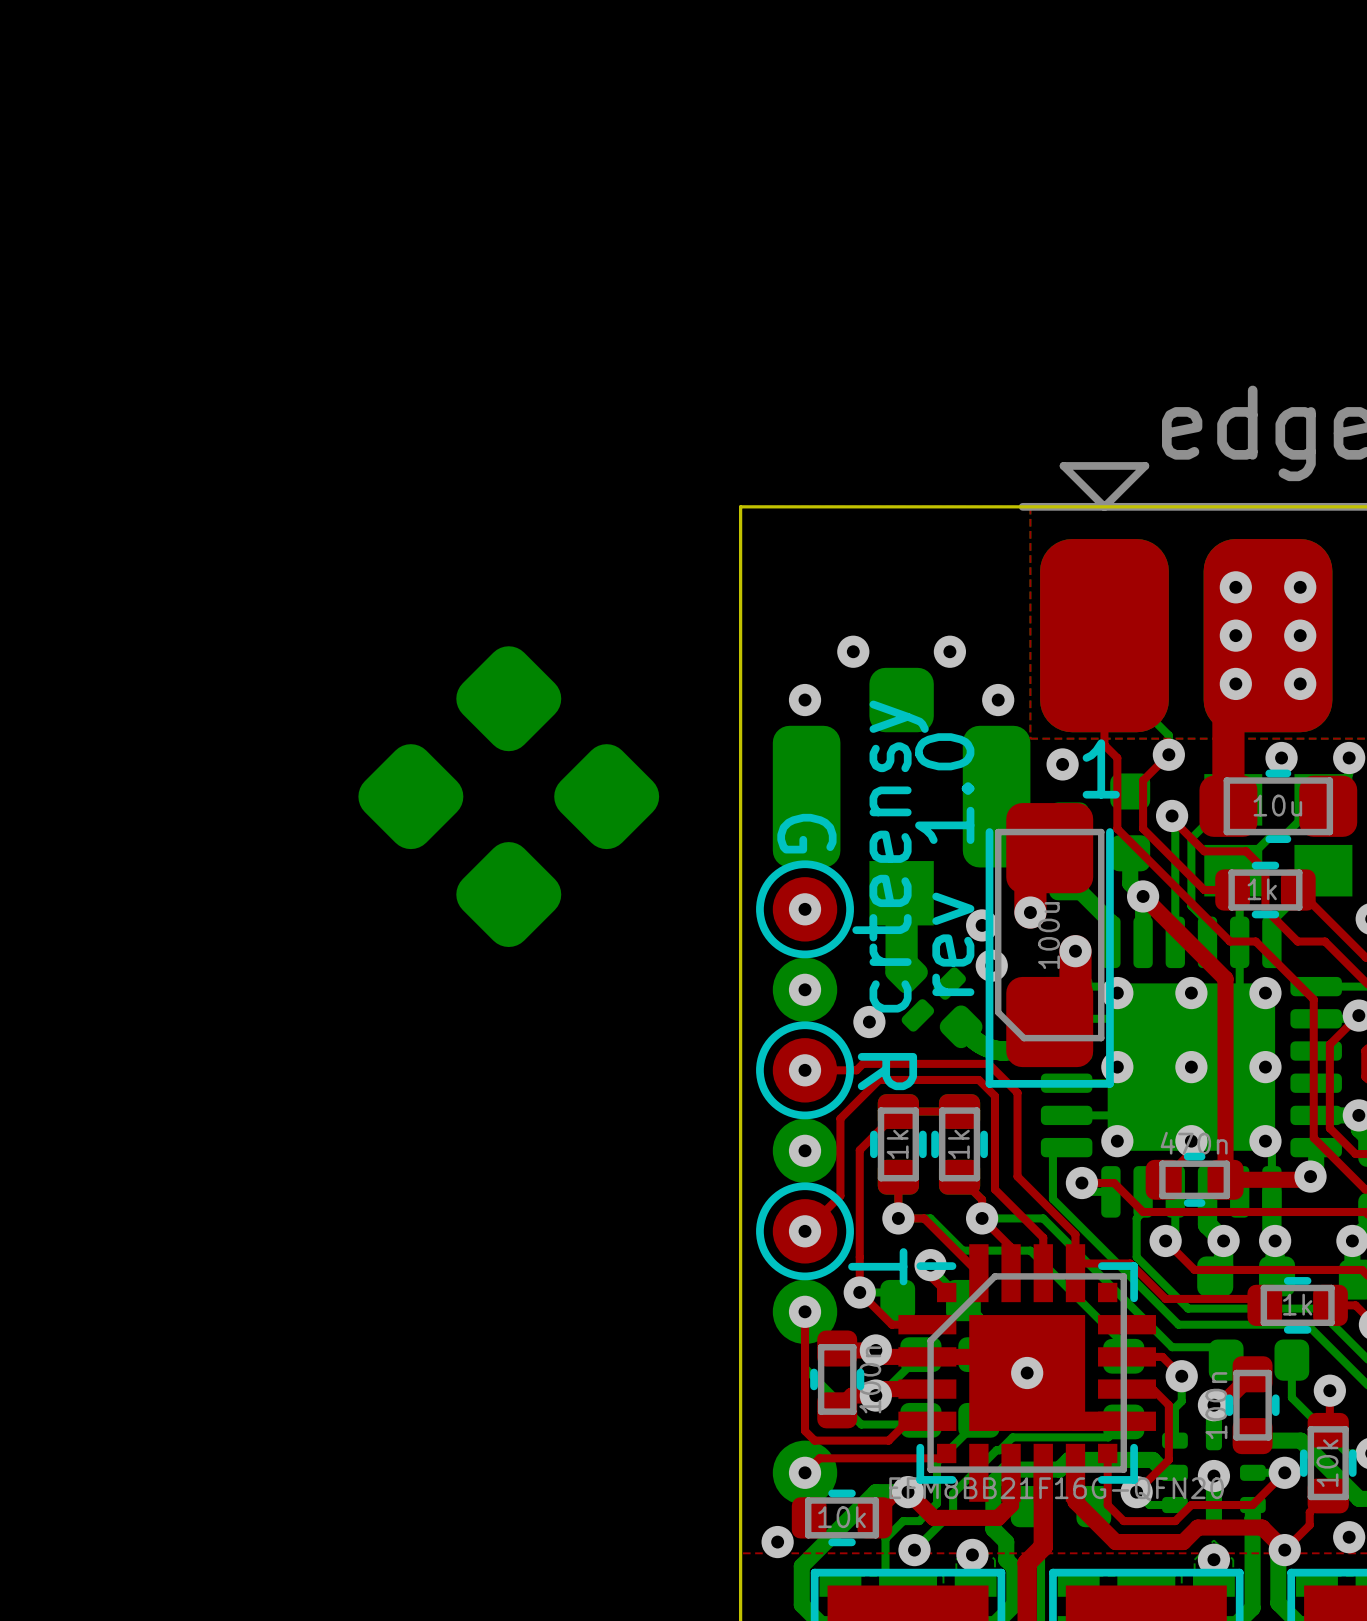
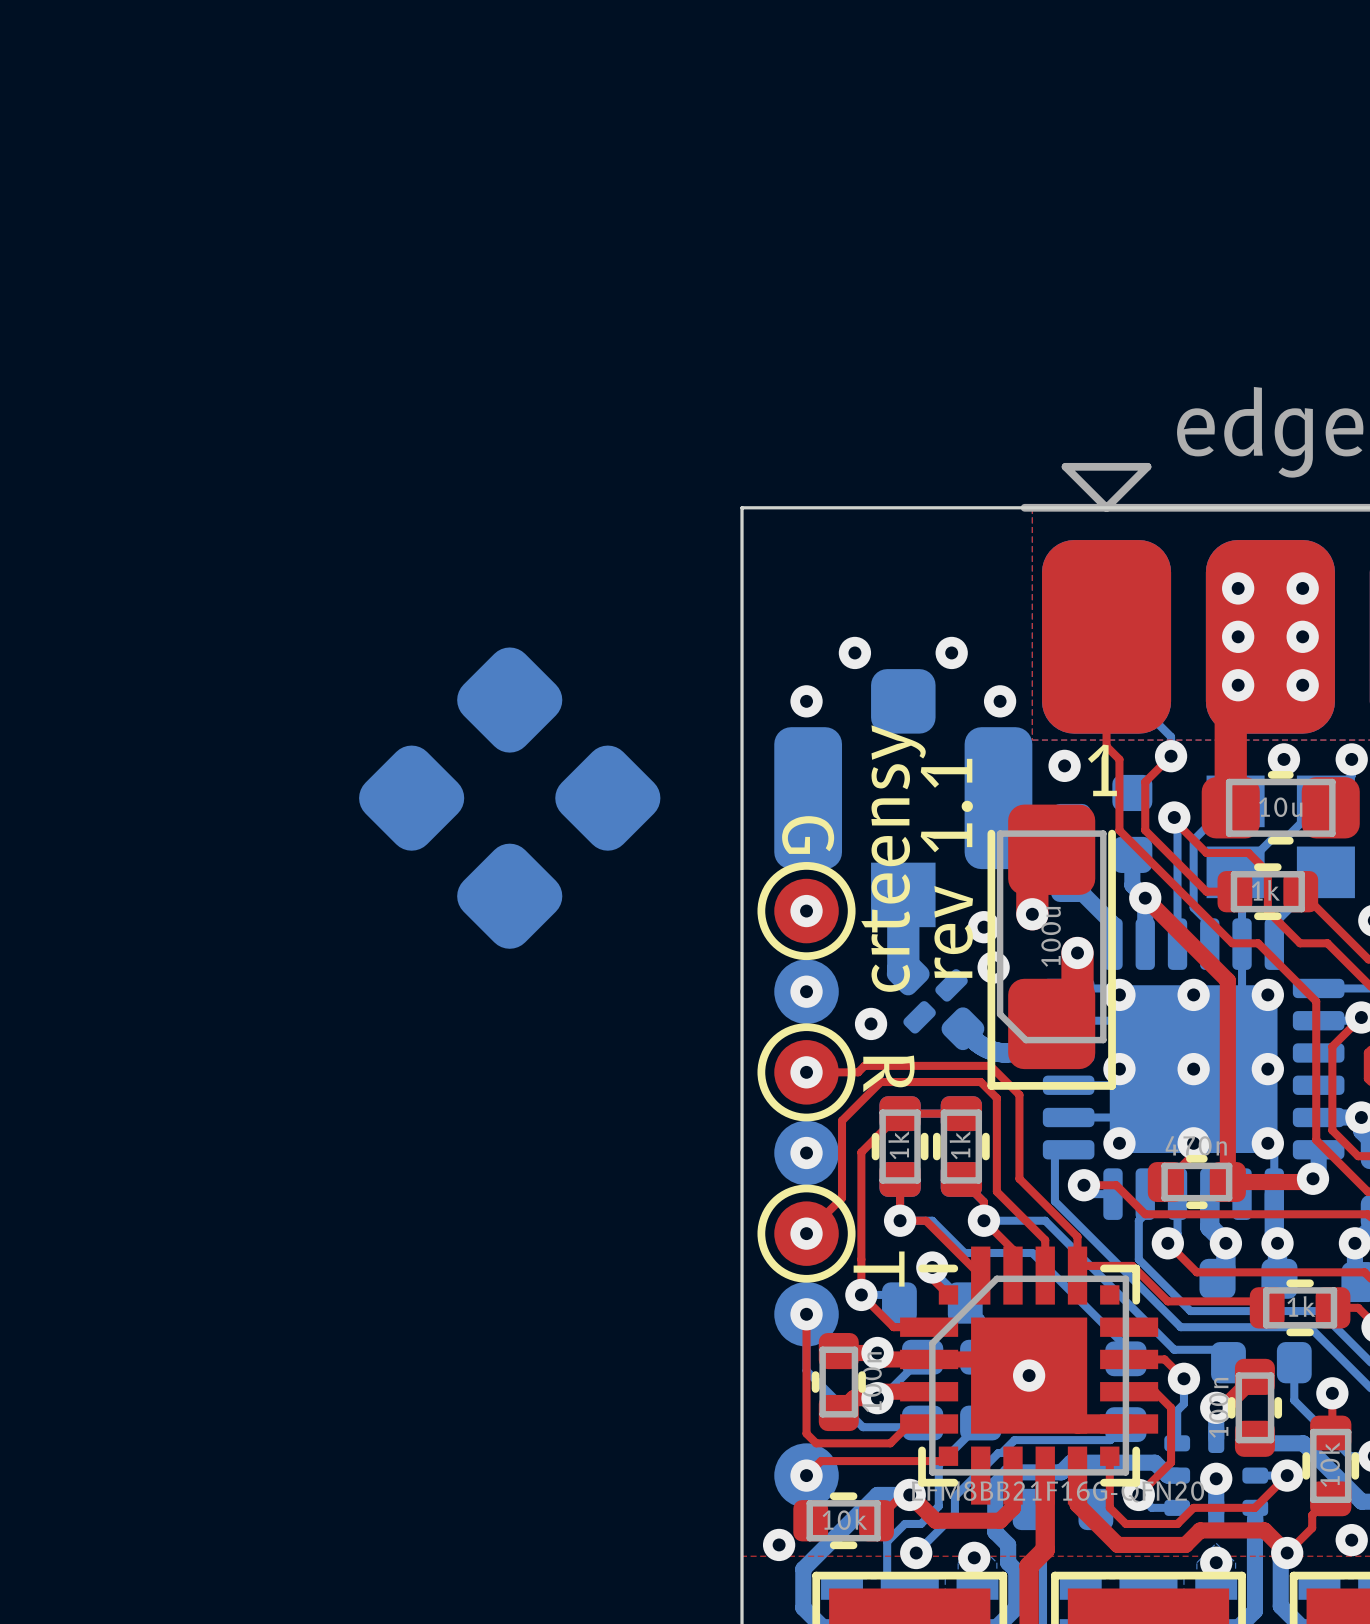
text: rev 1.0 (944, 864) -> rev 1.1 (946, 868)

